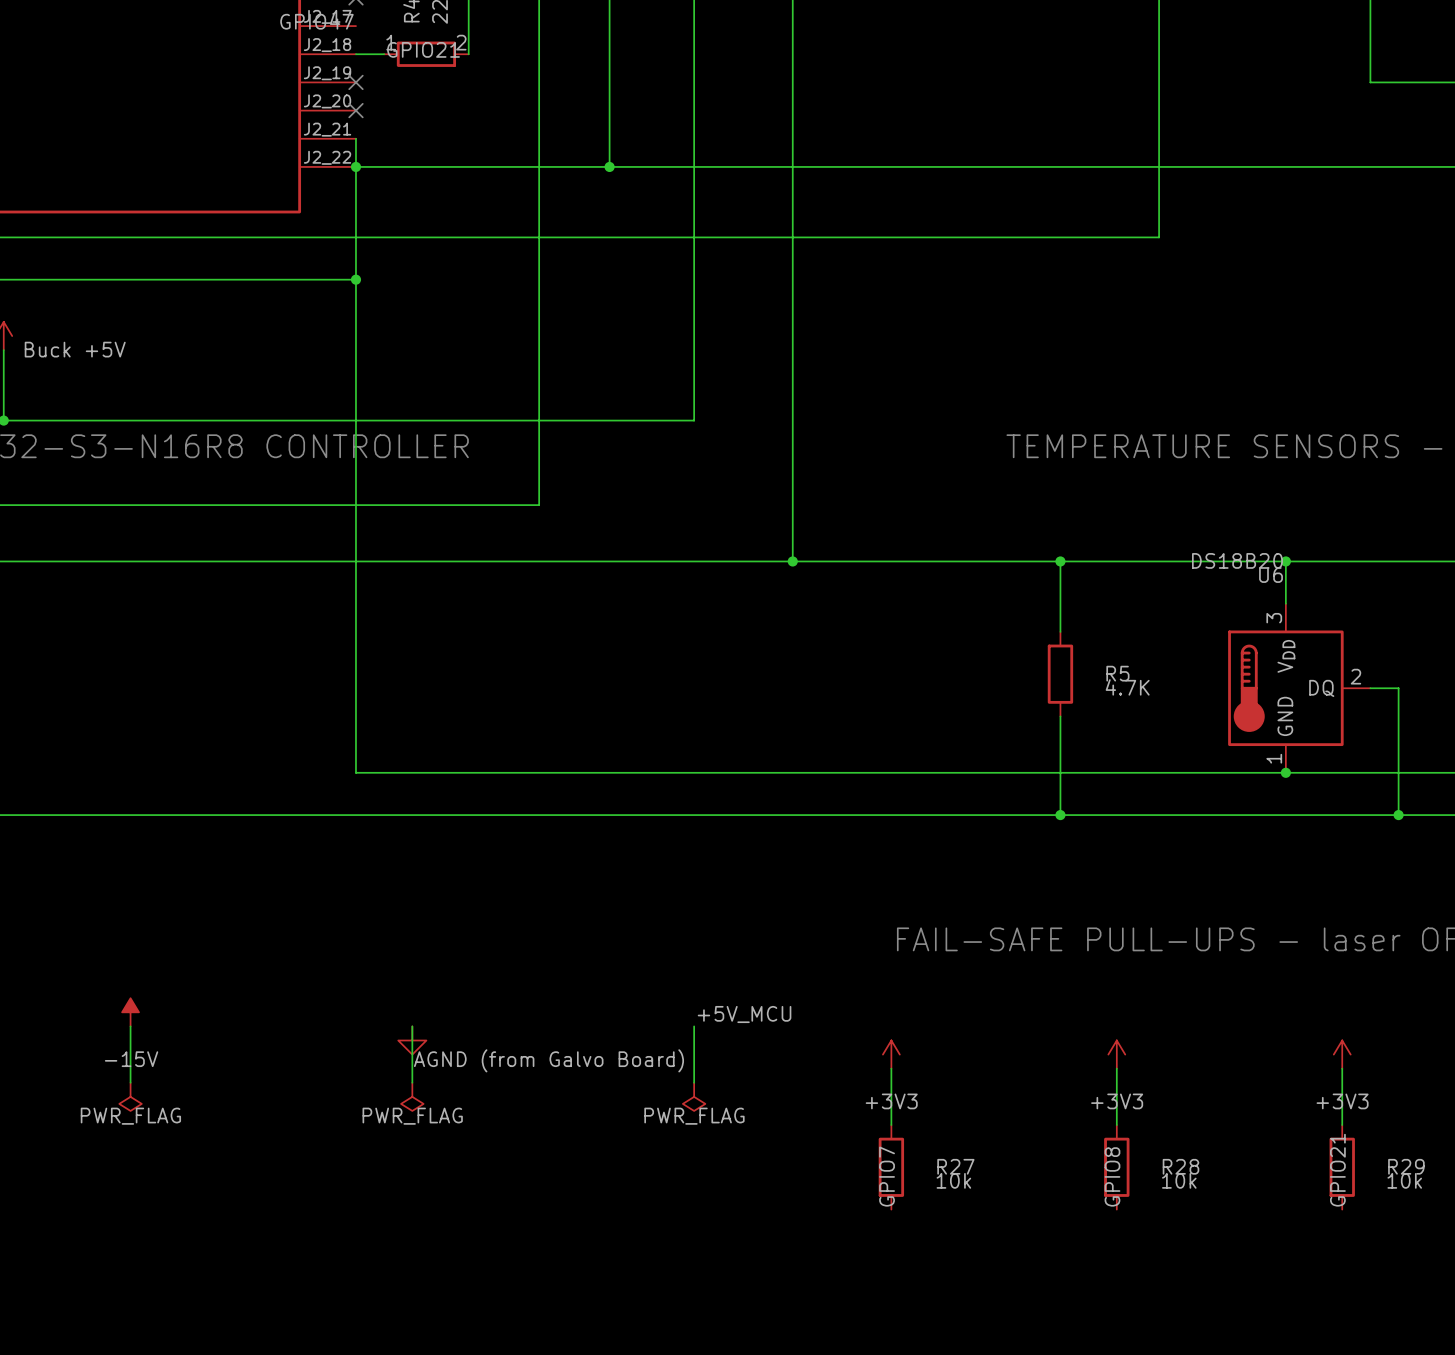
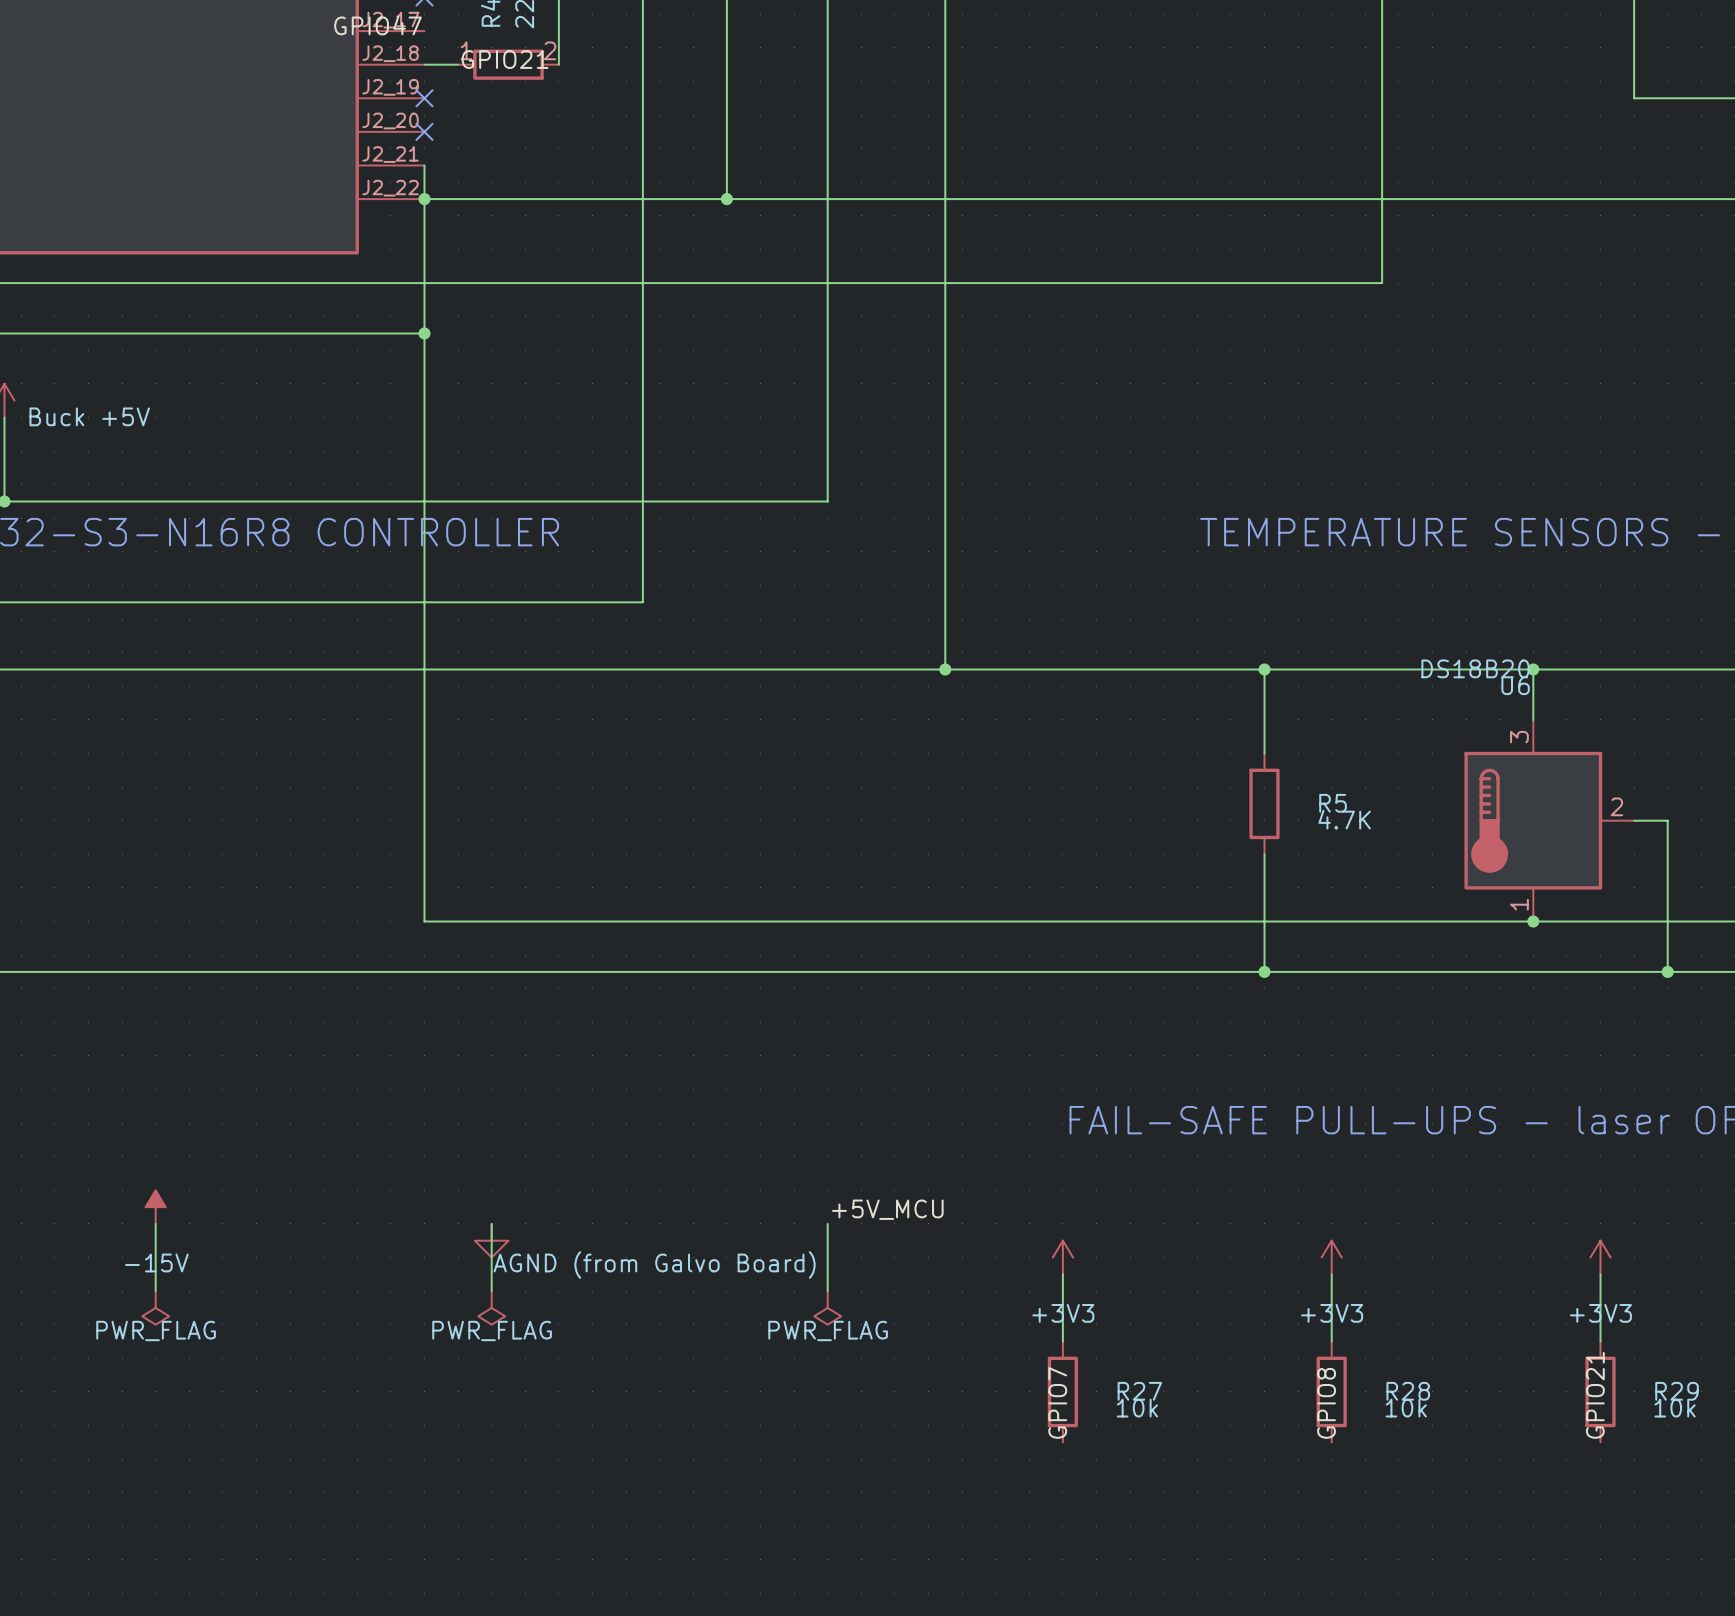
U6 pin name: VDD (1286, 656) -> none
U6 pin name: DQ (1321, 688) -> none
U6 pin name: GND (1285, 716) -> none

